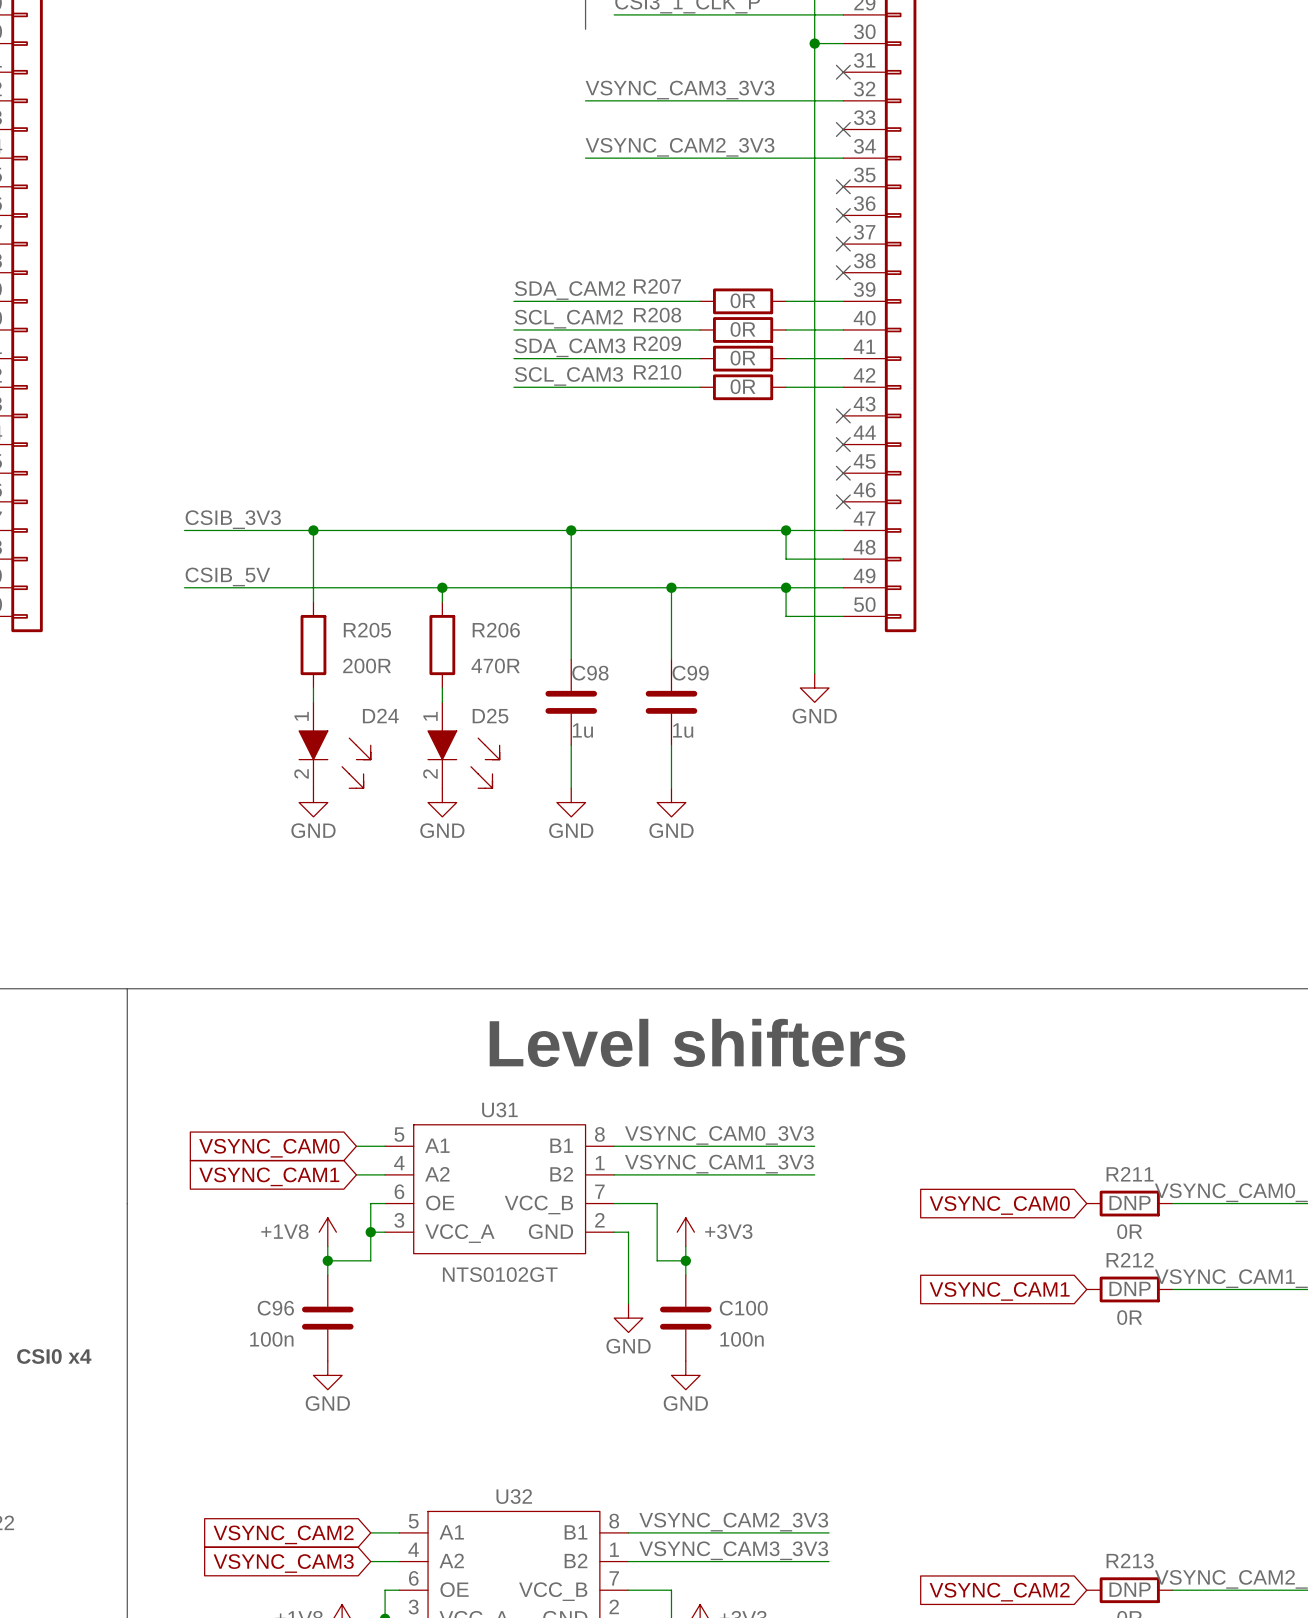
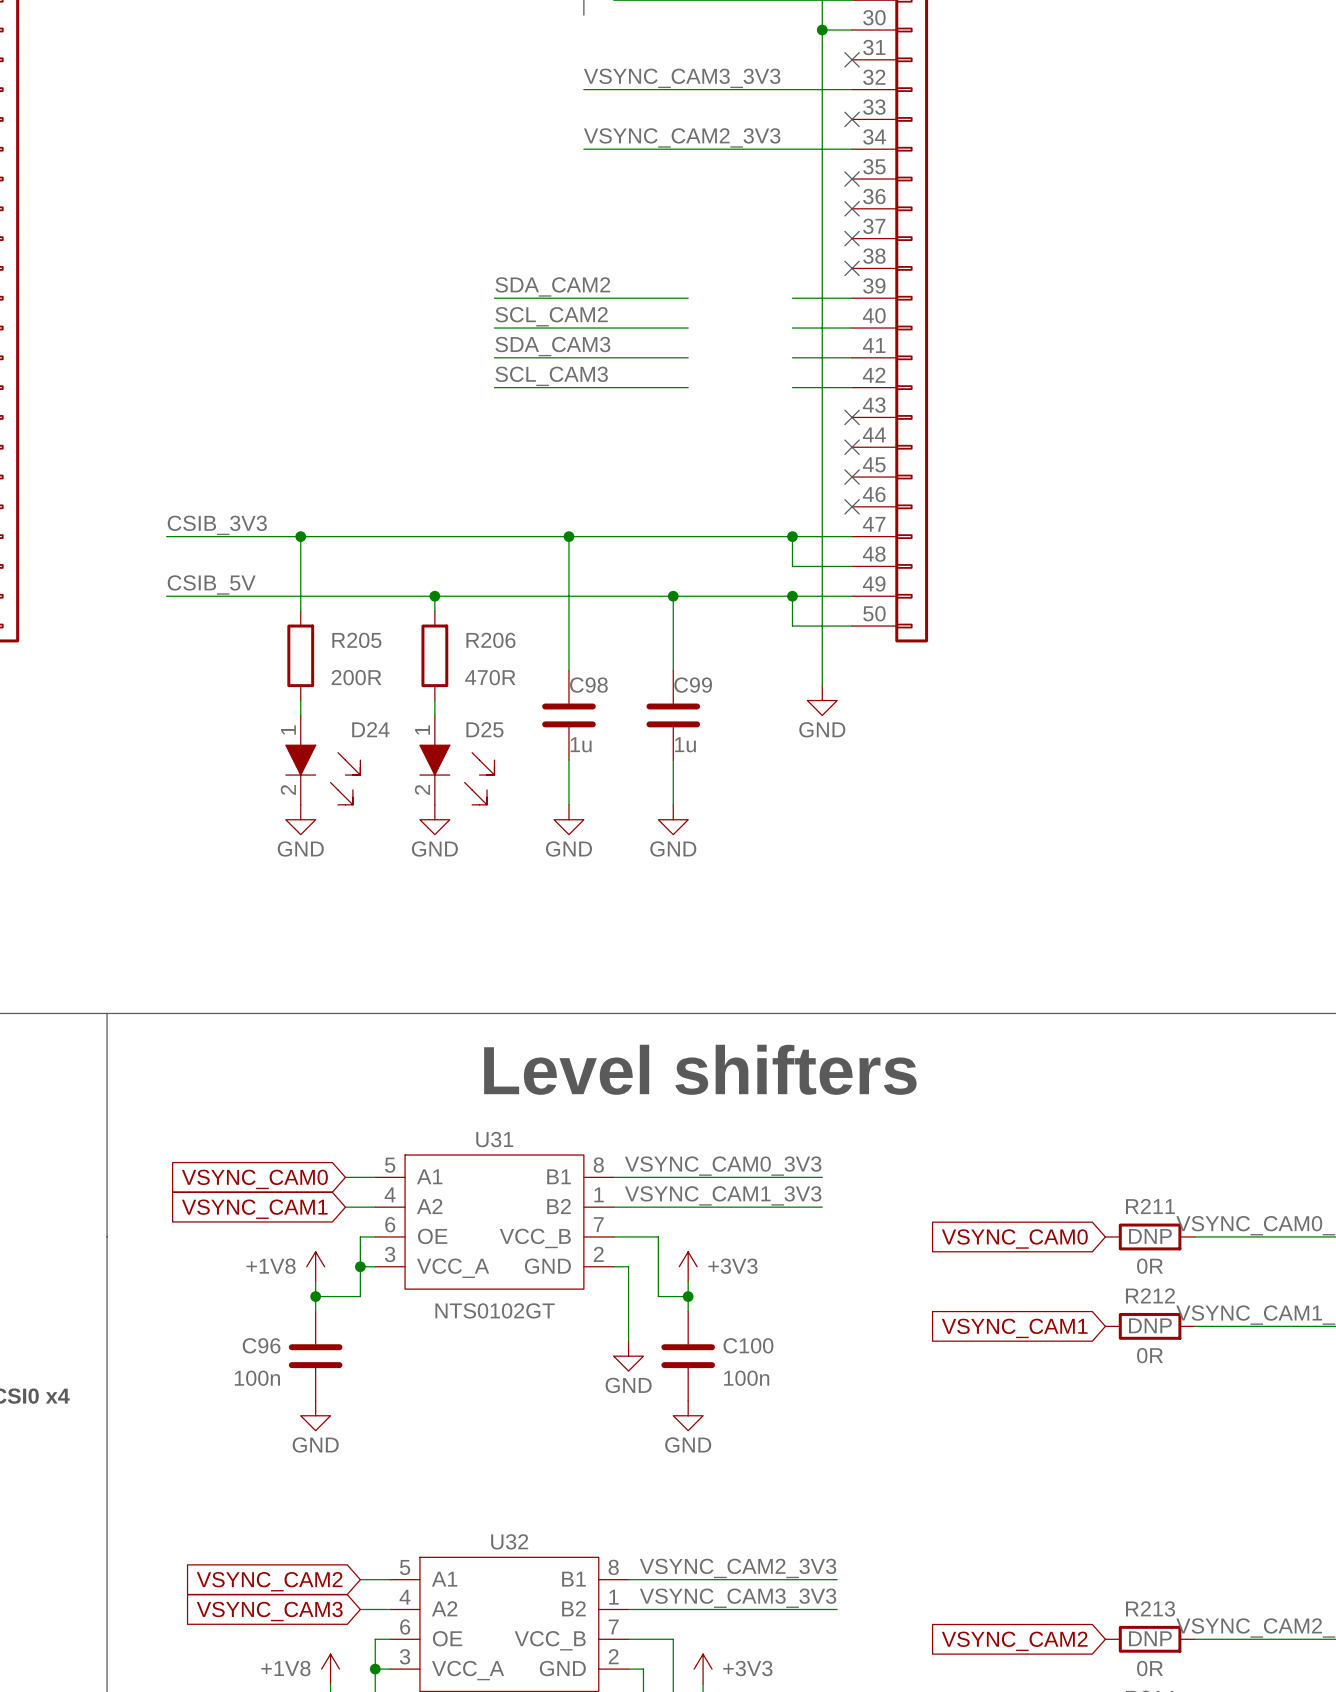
label position: SDA_CAM2 (570, 290) -> SDA_CAM2 (552, 286)
wire: (685, 301) (700, 301) -> (494, 298) (509, 298)
R207: (743, 301) -> none
label position: SCL_CAM2 (568, 319) -> SCL_CAM2 (551, 316)
wire: (685, 329) (700, 329) -> (494, 328) (509, 328)
R208: (743, 329) -> none
label position: SDA_CAM3 (570, 347) -> SDA_CAM3 (552, 346)
wire: (685, 358) (700, 358) -> (494, 357) (509, 357)
R209: (743, 358) -> none
label position: SCL_CAM3 (568, 376) -> SCL_CAM3 (551, 376)
wire: (685, 387) (700, 387) -> (494, 387) (509, 387)
R210: (743, 387) -> none

